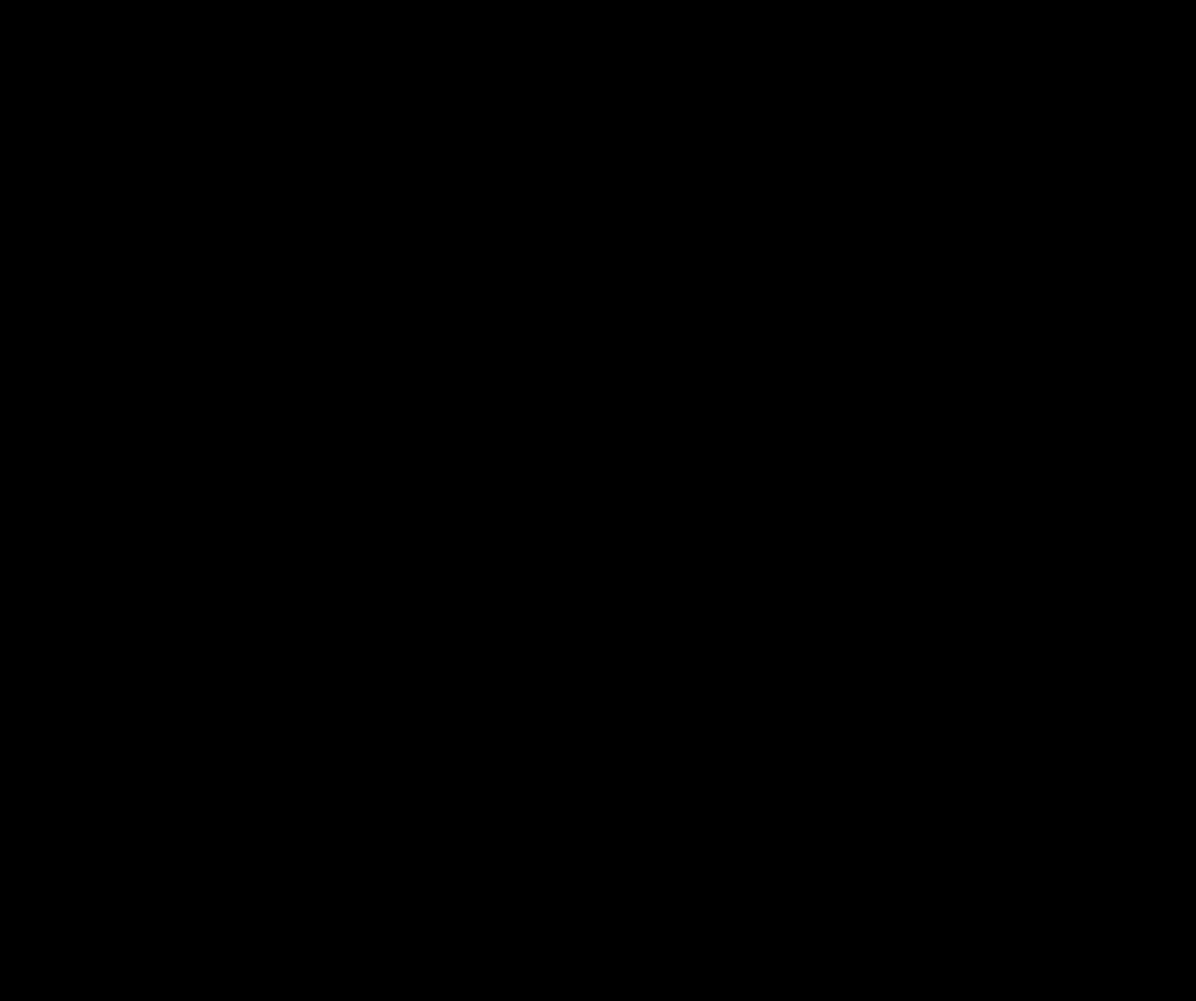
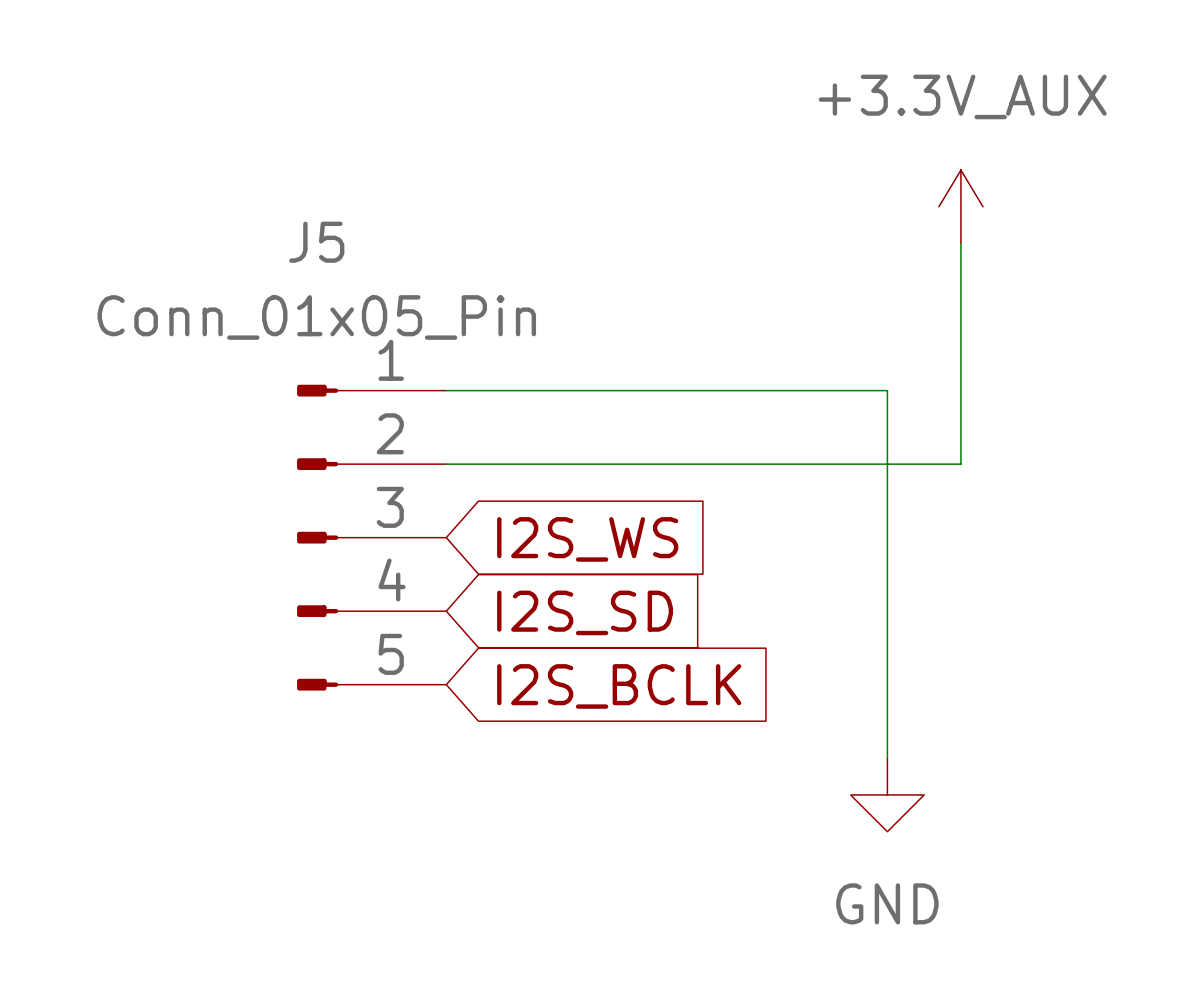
power symbol: none -> +3.3V_AUX (960, 206)
wire: none -> (960, 243) (960, 464) (446, 464)
wire: none -> (446, 390) (887, 390) (887, 758)
J5: none -> Conn_01x05_Pin (371, 537)
global label: none -> I2S_WS (587, 539)
global label: none -> I2S_SD (585, 612)
global label: none -> I2S_BCLK (619, 686)
power symbol: none -> GND (887, 794)

